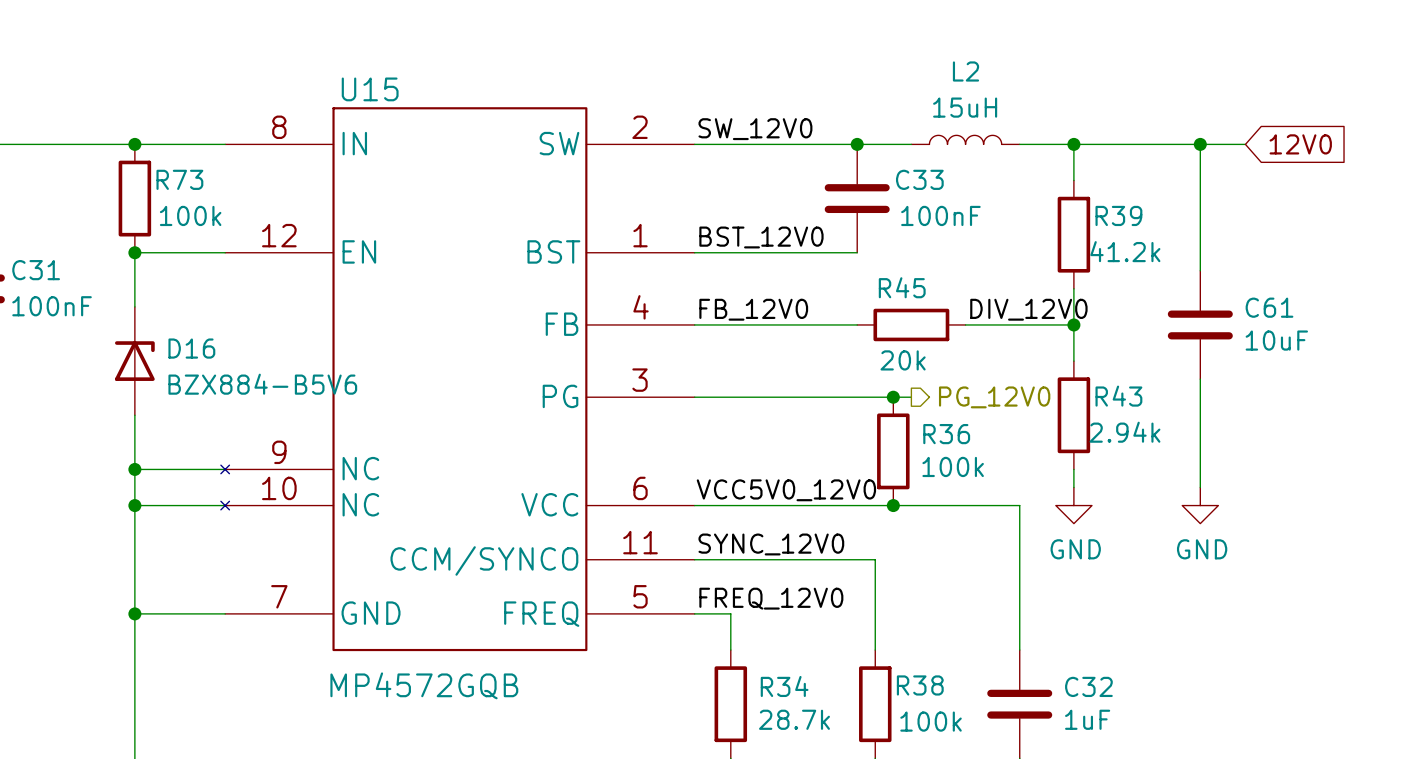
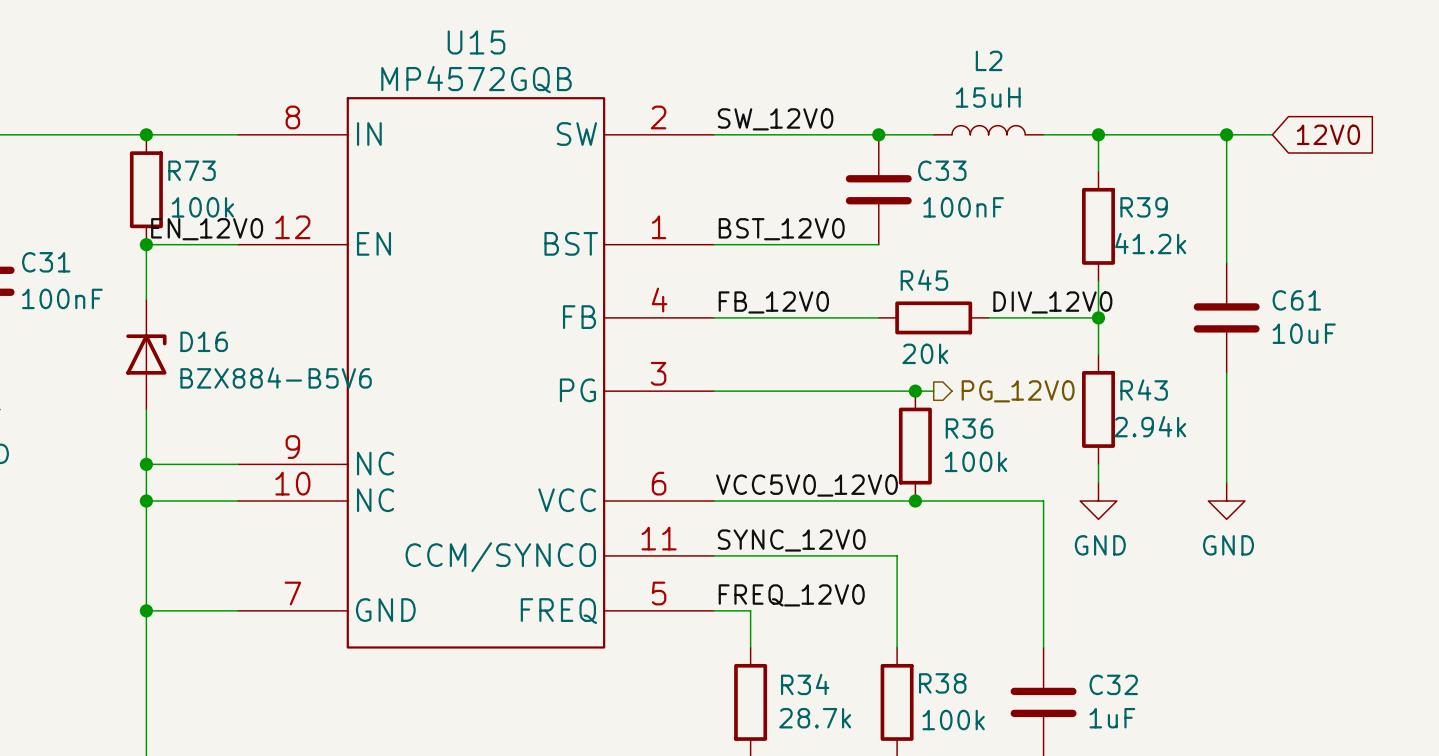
U15 name position: U15 (370, 89) -> U15 (476, 42)
U15 symbol: [220, 107, 695, 652] -> [237, 97, 714, 649]
label: none -> EN_12V0 (207, 229)
U15 value position: MP4572GQB (424, 685) -> MP4572GQB (476, 79)

